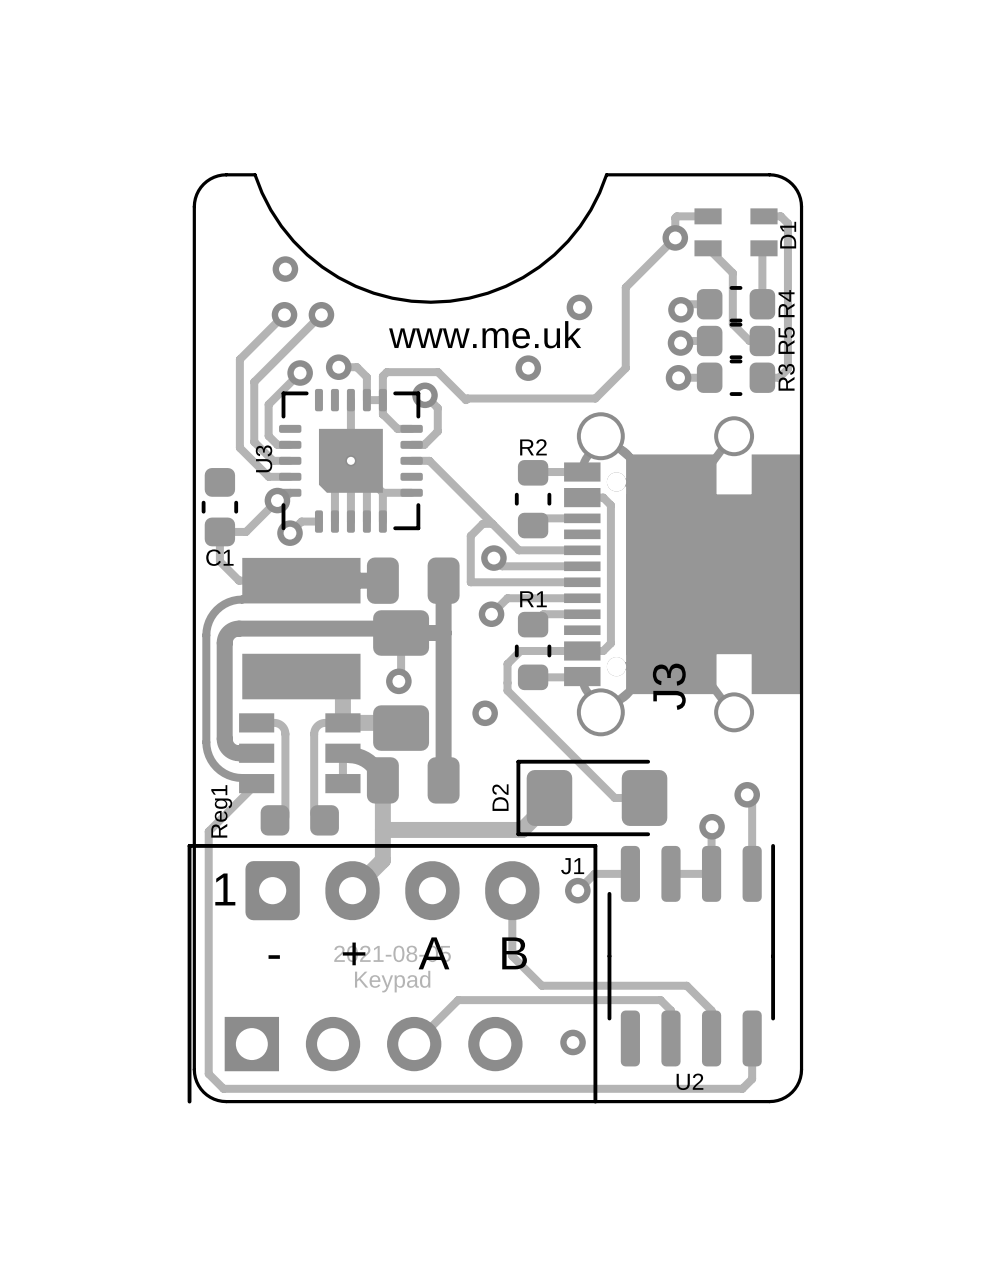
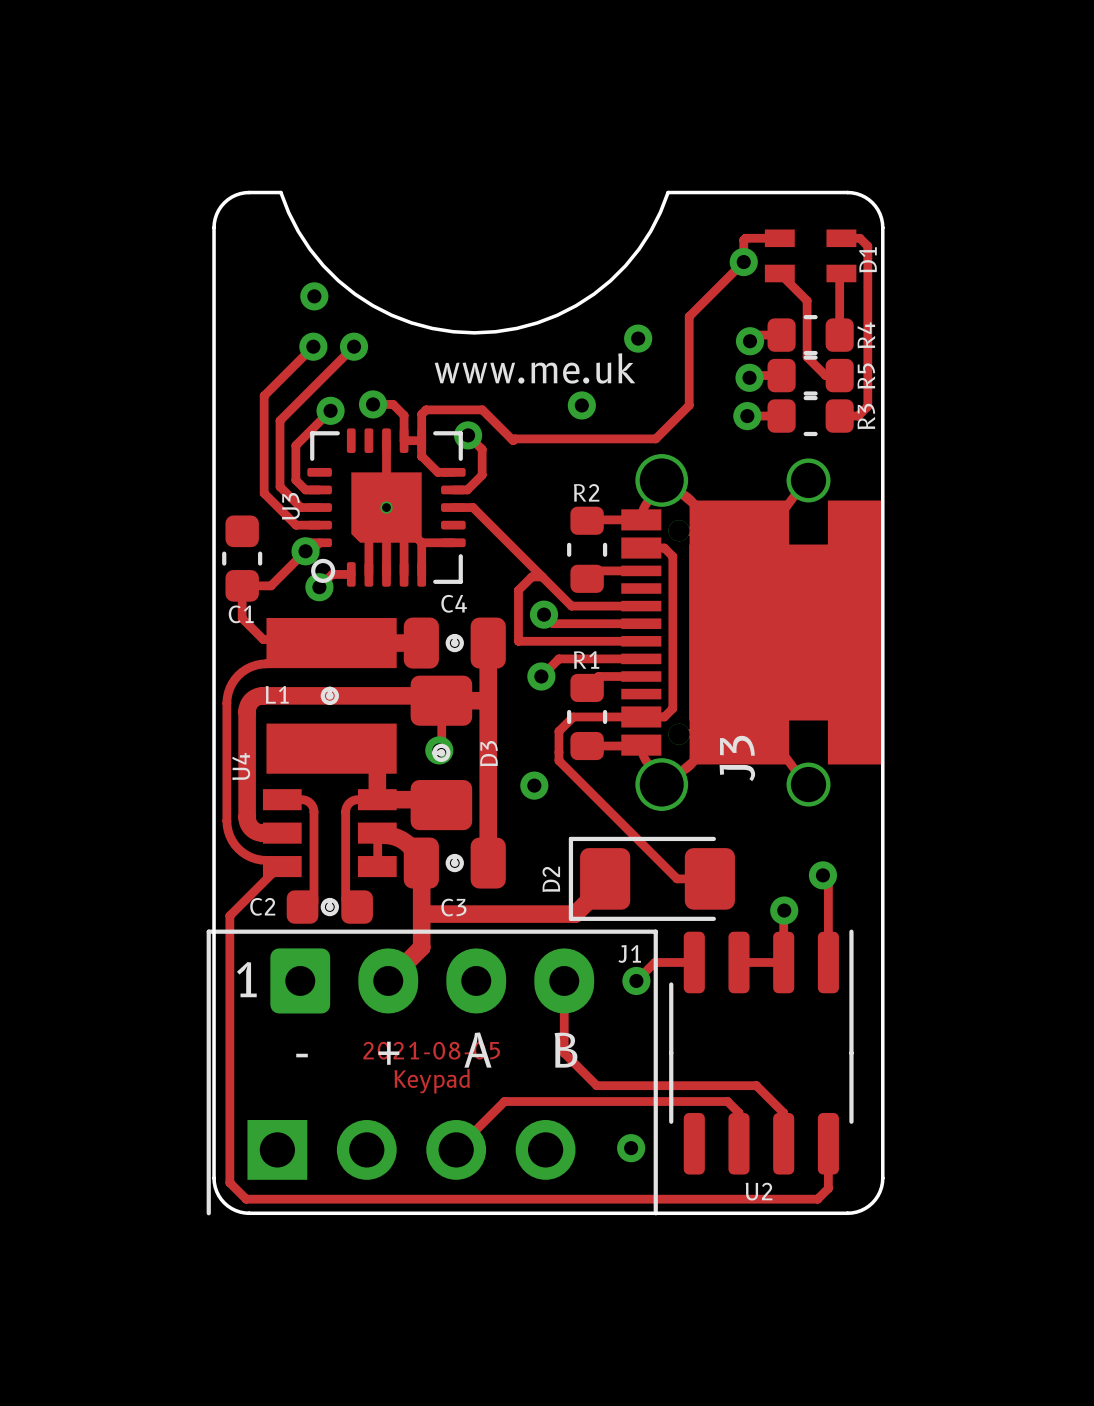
U3 footprint: [279, 388, 423, 533] -> [307, 428, 466, 587]
C4: none -> (454, 643)
L1: none -> (329, 695)
D3: none -> (441, 752)
Reg1: (330, 696) -> none
U4: none -> (364, 770)
C3: none -> (454, 863)
C2: none -> (329, 907)

